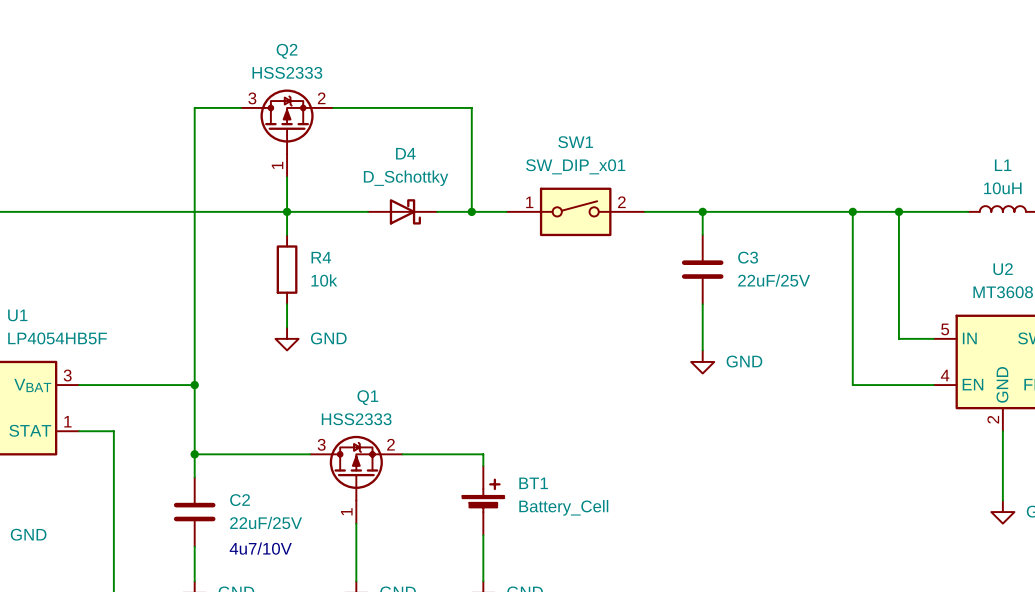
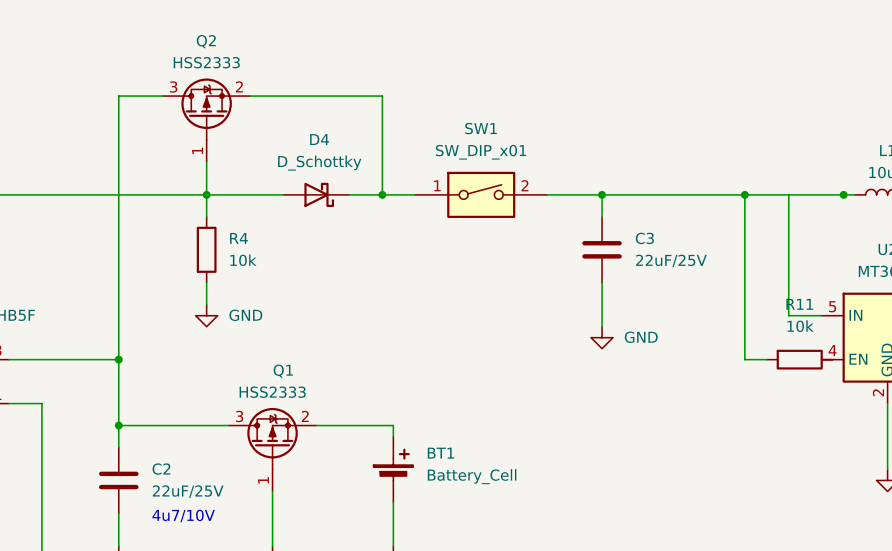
junction: (898, 211) -> none
junction: none -> (843, 194)
wire: (875, 385) (933, 385) -> none
R11: none -> 10k (799, 359)

